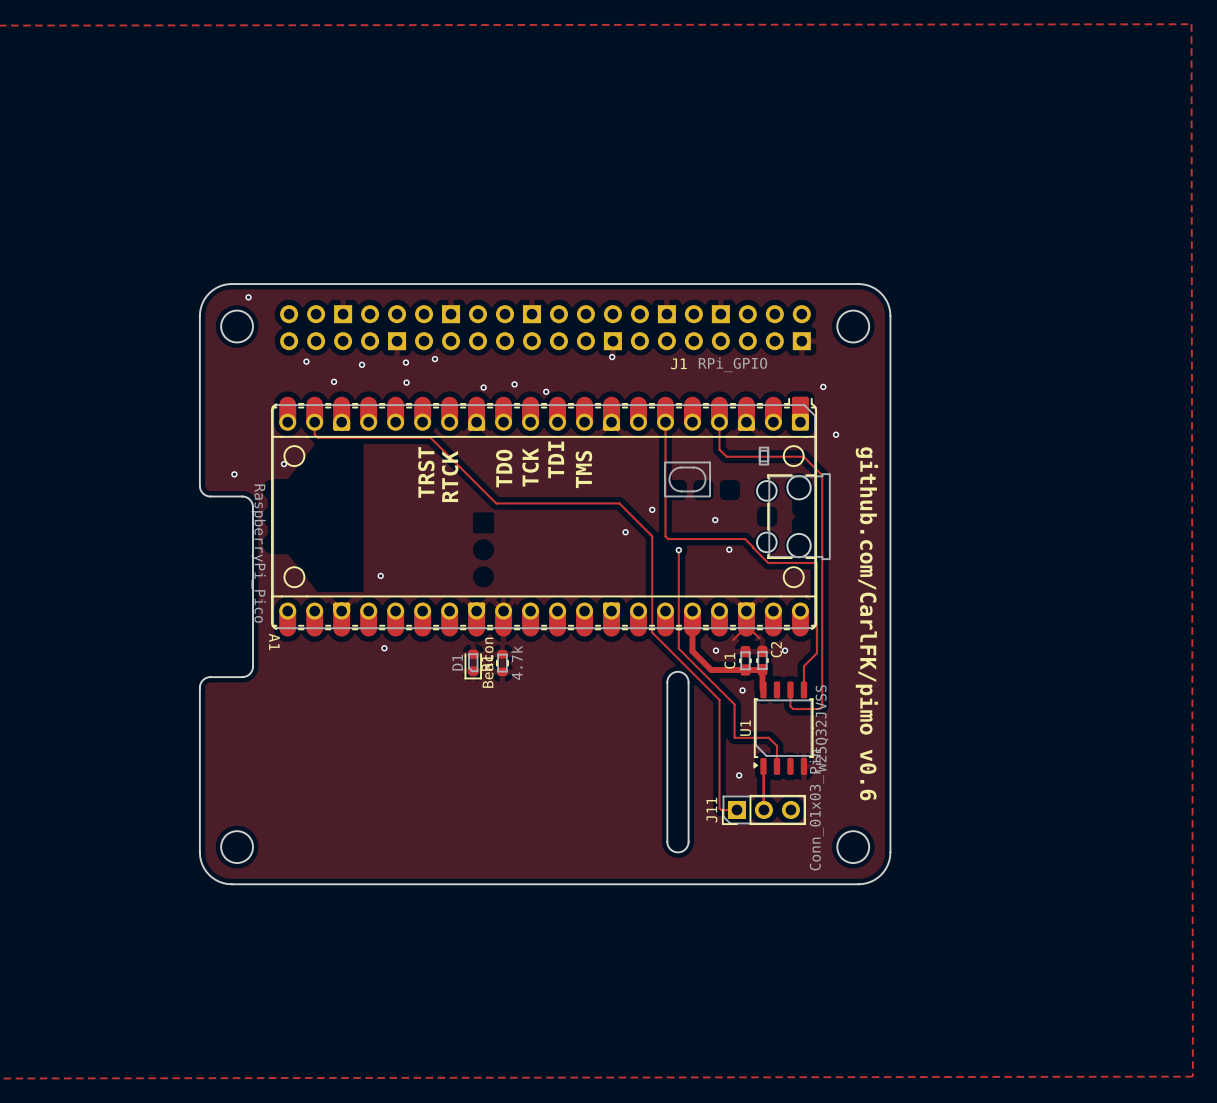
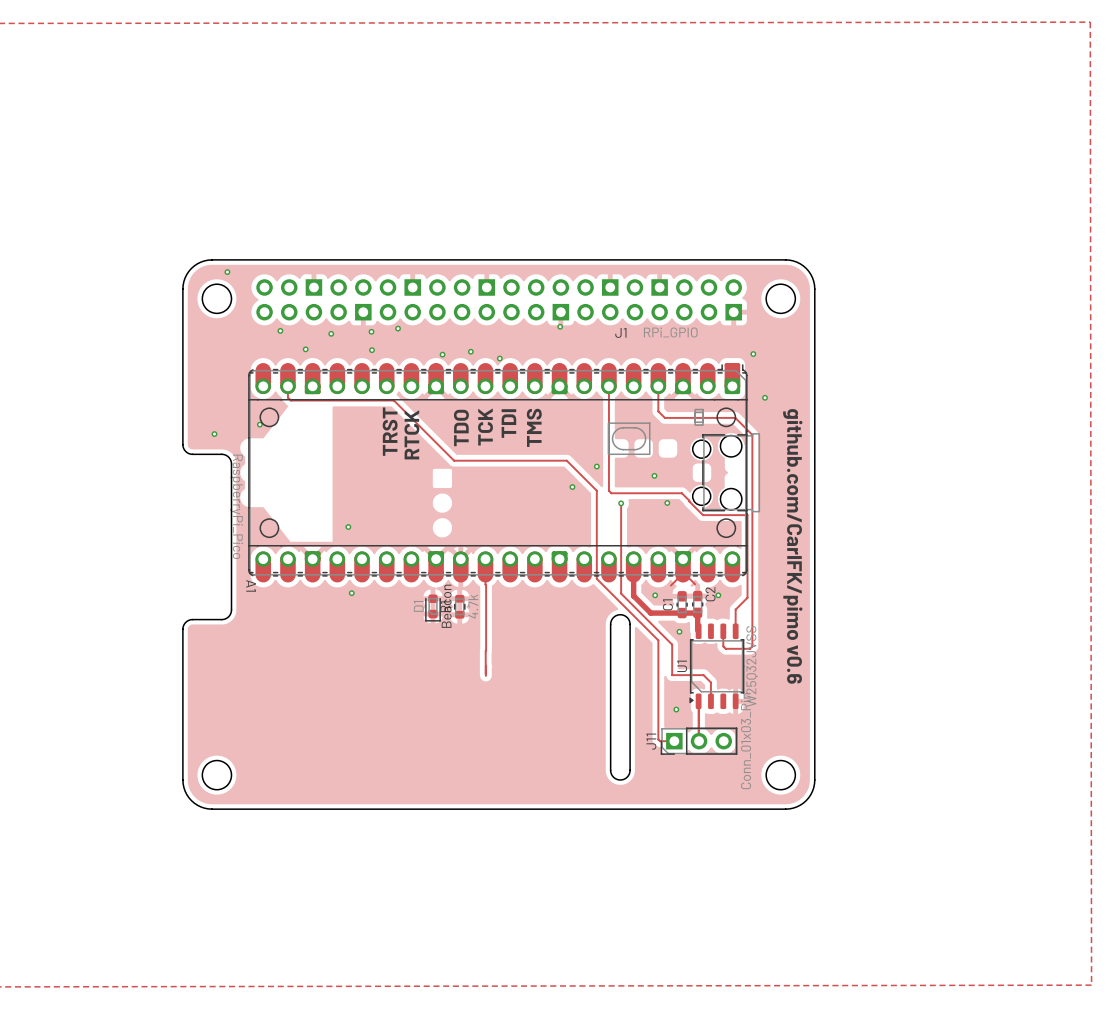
track: none -> (485, 559) (485, 673)
track: none -> (486, 666) (485, 675)

